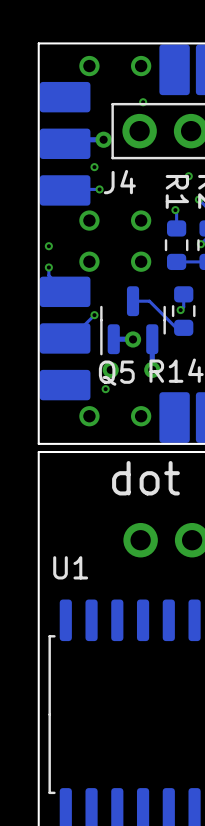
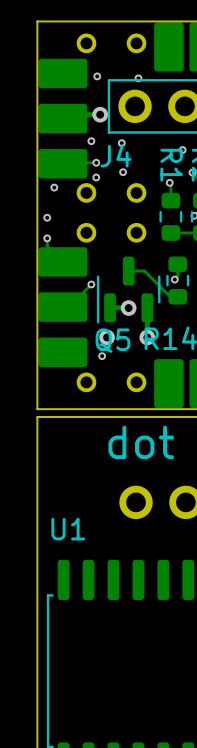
via: none -> (97, 76)
via: none -> (121, 143)
via: none -> (123, 172)
via: none -> (96, 177)
via: none -> (54, 187)

